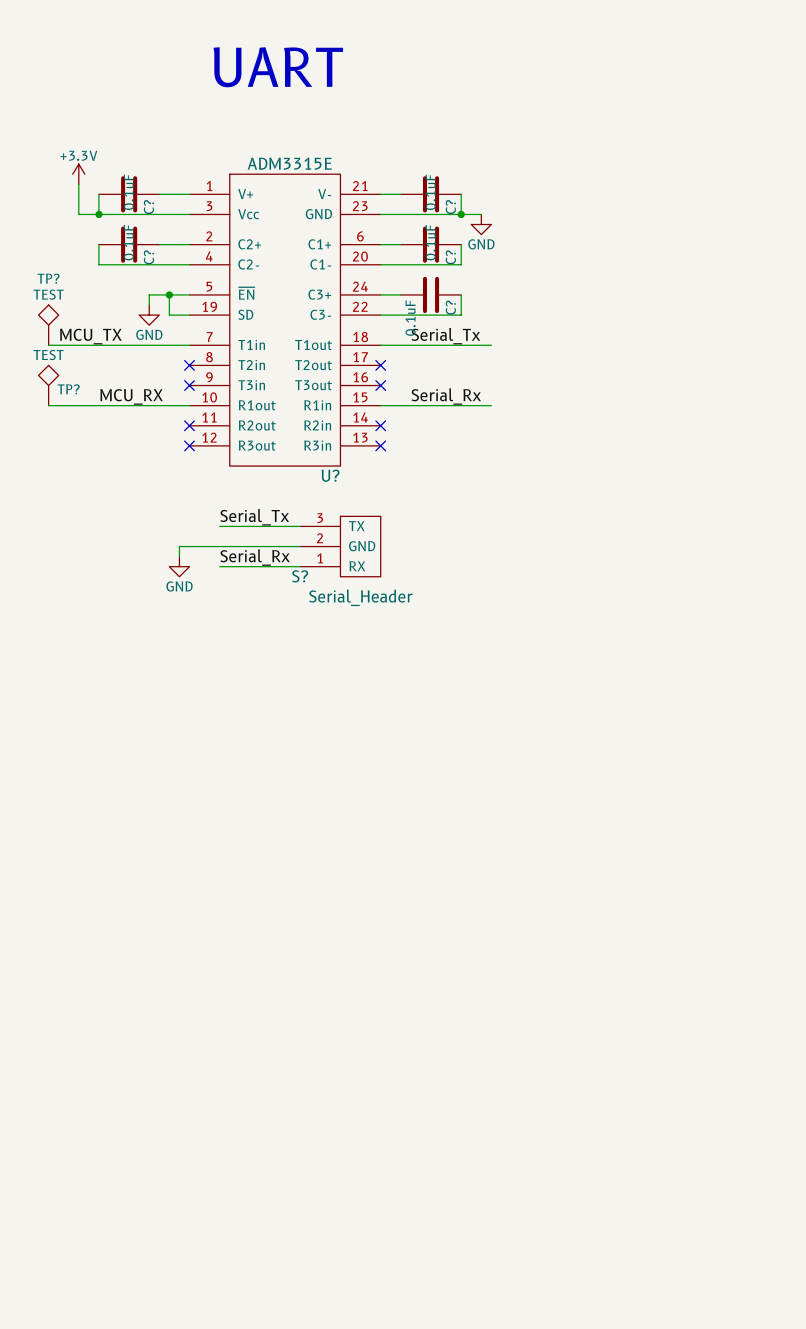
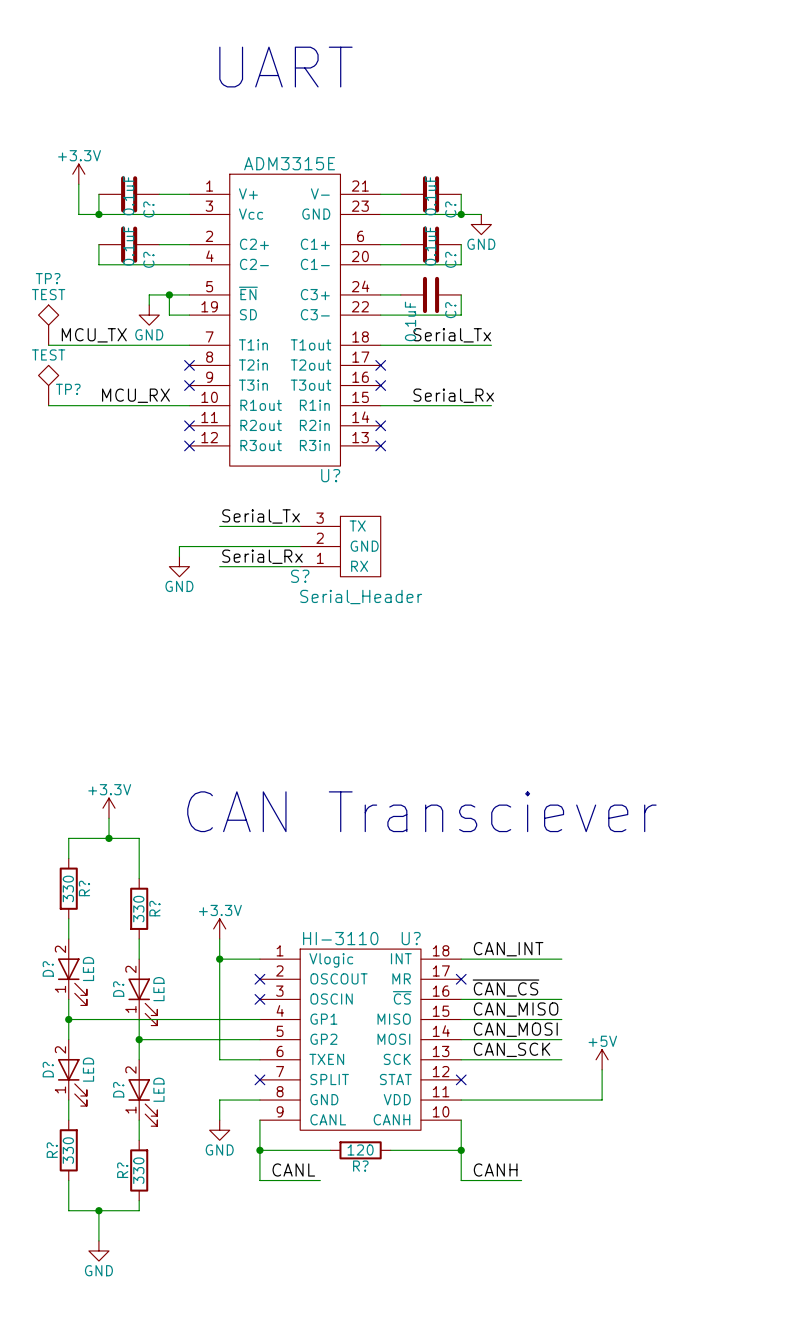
power symbol: none -> +3.3V (109, 808)
text: none -> CAN Transciever (421, 811)
wire: none -> (109, 818) (109, 838)
junction: none -> (109, 838)
wire: none -> (68, 858) (68, 838) (139, 838) (139, 878)
R?: none -> 330 (68, 888)
R?: none -> 330 (139, 908)
wire: none -> (68, 918) (68, 939)
power symbol: none -> +3.3V (219, 928)
wire: none -> (139, 939) (139, 959)
wire: none -> (219, 939) (219, 1059) (259, 1059)
label: none -> CAN_INT (508, 949)
wire: none -> (219, 959) (259, 959)
junction: none -> (219, 959)
wire: none -> (461, 959) (561, 959)
D?: none -> LED (72, 972)
no-connect mark: none -> (259, 979)
no-connect mark: none -> (461, 979)
label: none -> ~{CAN_CS} (506, 988)
D?: none -> LED (142, 992)
wire: none -> (68, 999) (68, 1039)
no-connect mark: none -> (259, 999)
wire: none -> (461, 999) (561, 999)
label: none -> CAN_MISO (516, 1009)
wire: none -> (68, 1019) (259, 1019)
junction: none -> (68, 1019)
wire: none -> (139, 1019) (139, 1059)
wire: none -> (461, 1019) (561, 1019)
label: none -> CAN_MOSI (515, 1029)
wire: none -> (139, 1039) (259, 1039)
junction: none -> (139, 1039)
U?: none -> HI-3110 (360, 1039)
wire: none -> (461, 1039) (561, 1039)
label: none -> CAN_SCK (512, 1049)
wire: none -> (461, 1059) (561, 1059)
power symbol: none -> +5V (602, 1059)
wire: none -> (602, 1069) (602, 1100) (461, 1100)
D?: none -> LED (72, 1072)
no-connect mark: none -> (259, 1079)
no-connect mark: none -> (461, 1079)
D?: none -> LED (142, 1092)
wire: none -> (68, 1100) (68, 1120)
wire: none -> (259, 1100) (219, 1100) (219, 1120)
wire: none -> (139, 1120) (139, 1140)
wire: none -> (259, 1120) (259, 1180) (320, 1180)
wire: none -> (461, 1120) (461, 1180) (521, 1180)
power symbol: none -> GND (219, 1130)
R?: none -> 330 (68, 1150)
wire: none -> (259, 1150) (330, 1150)
junction: none -> (259, 1150)
R?: none -> 120 (360, 1150)
wire: none -> (390, 1150) (461, 1150)
junction: none -> (461, 1150)
R?: none -> 330 (139, 1170)
label: none -> CANL (293, 1170)
label: none -> CANH (495, 1170)
wire: none -> (68, 1180) (68, 1210) (139, 1210) (139, 1200)
wire: none -> (98, 1210) (98, 1240)
junction: none -> (98, 1210)
power symbol: none -> GND (98, 1250)

